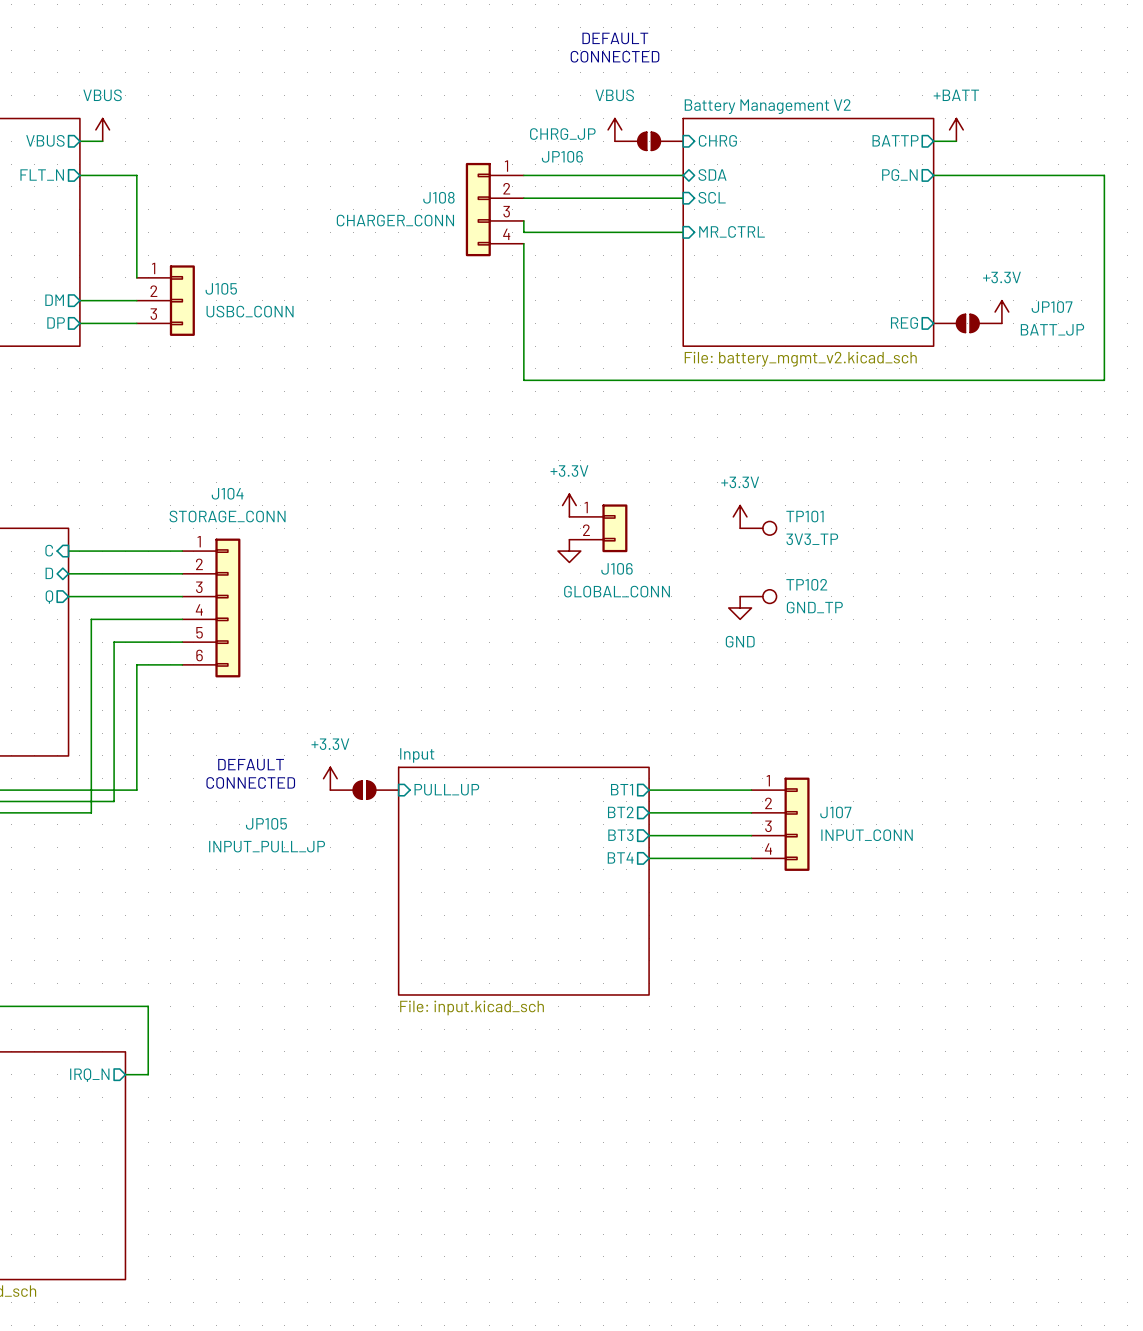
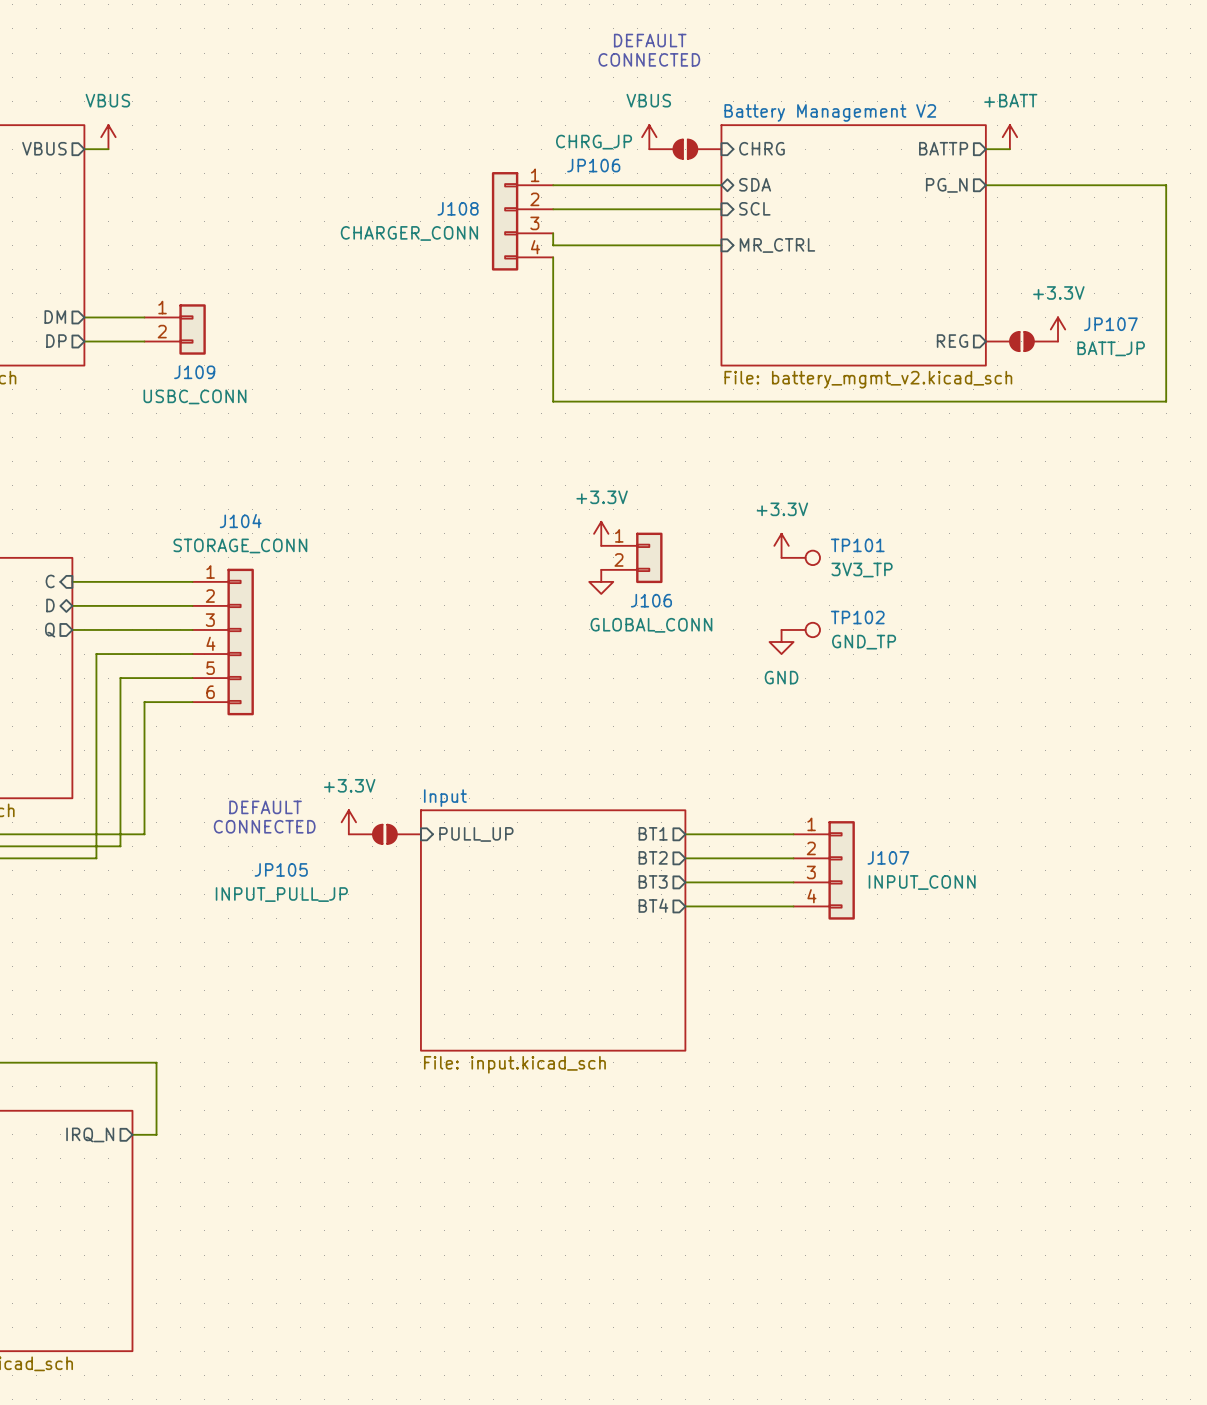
sheet pin: FLT_N (42, 175) -> none
wire: (79, 175) (136, 175) (136, 277) -> none
J105: USBC_CONN (165, 300) -> none
J109: none -> USBC_CONN (175, 329)

